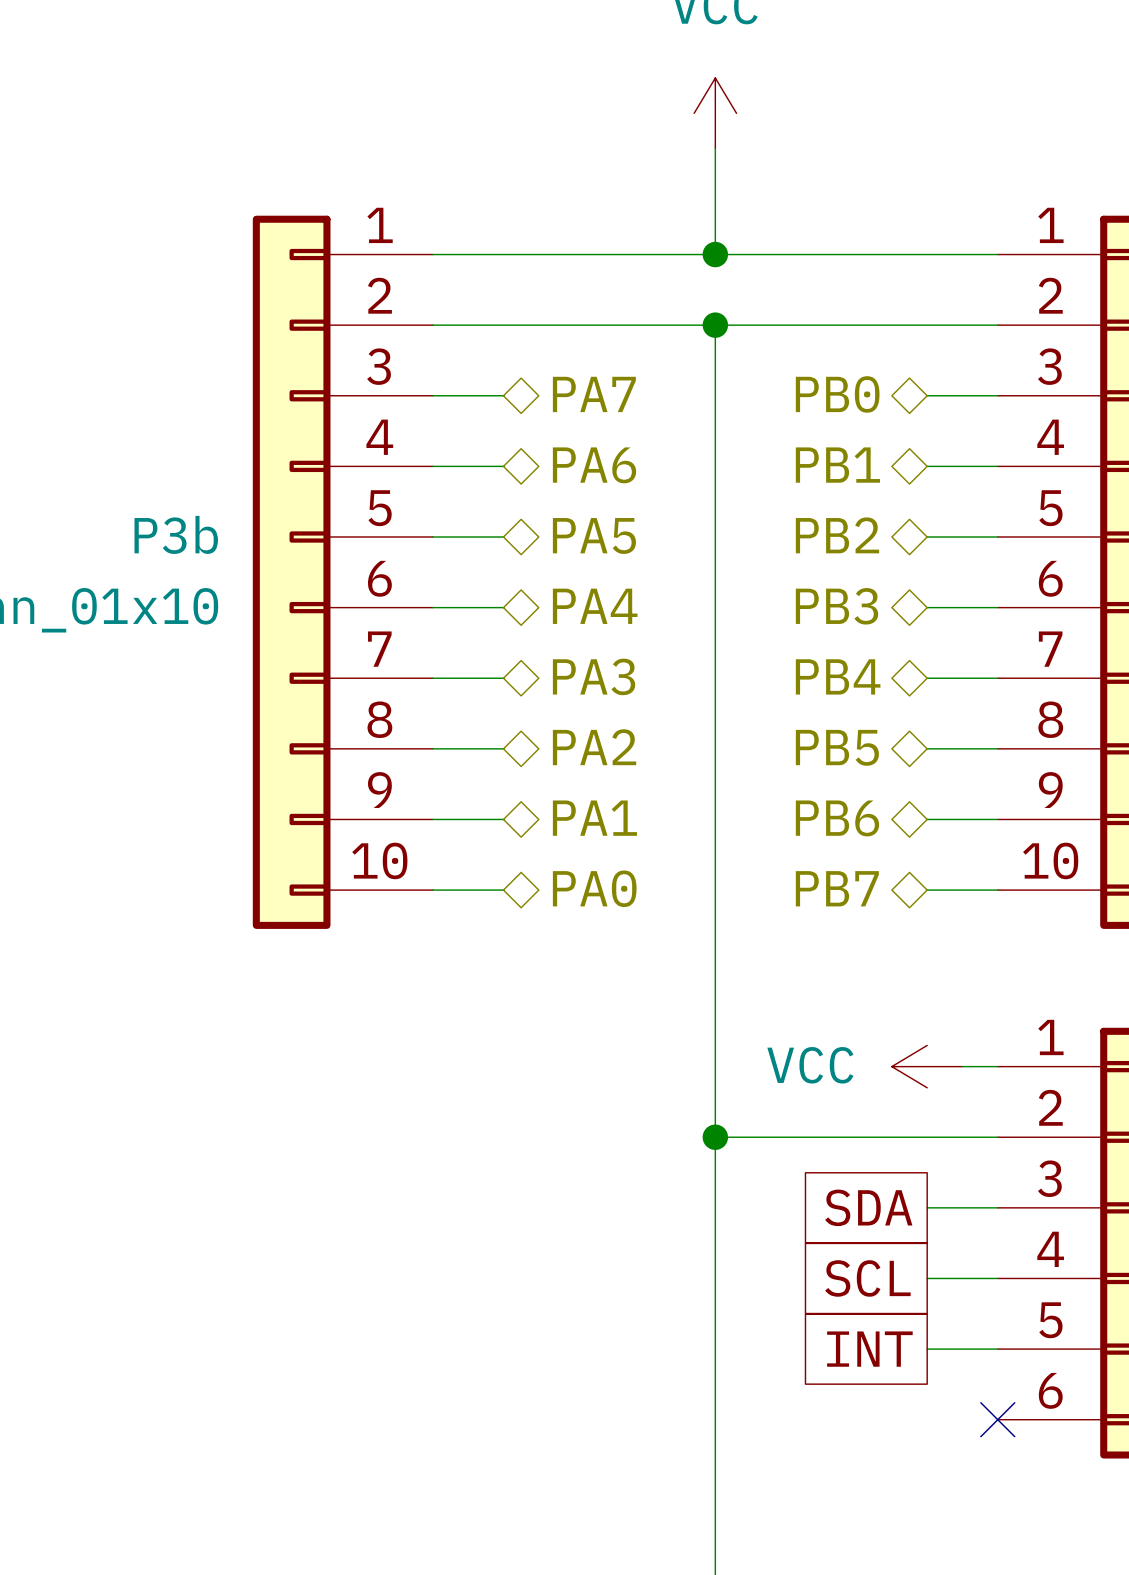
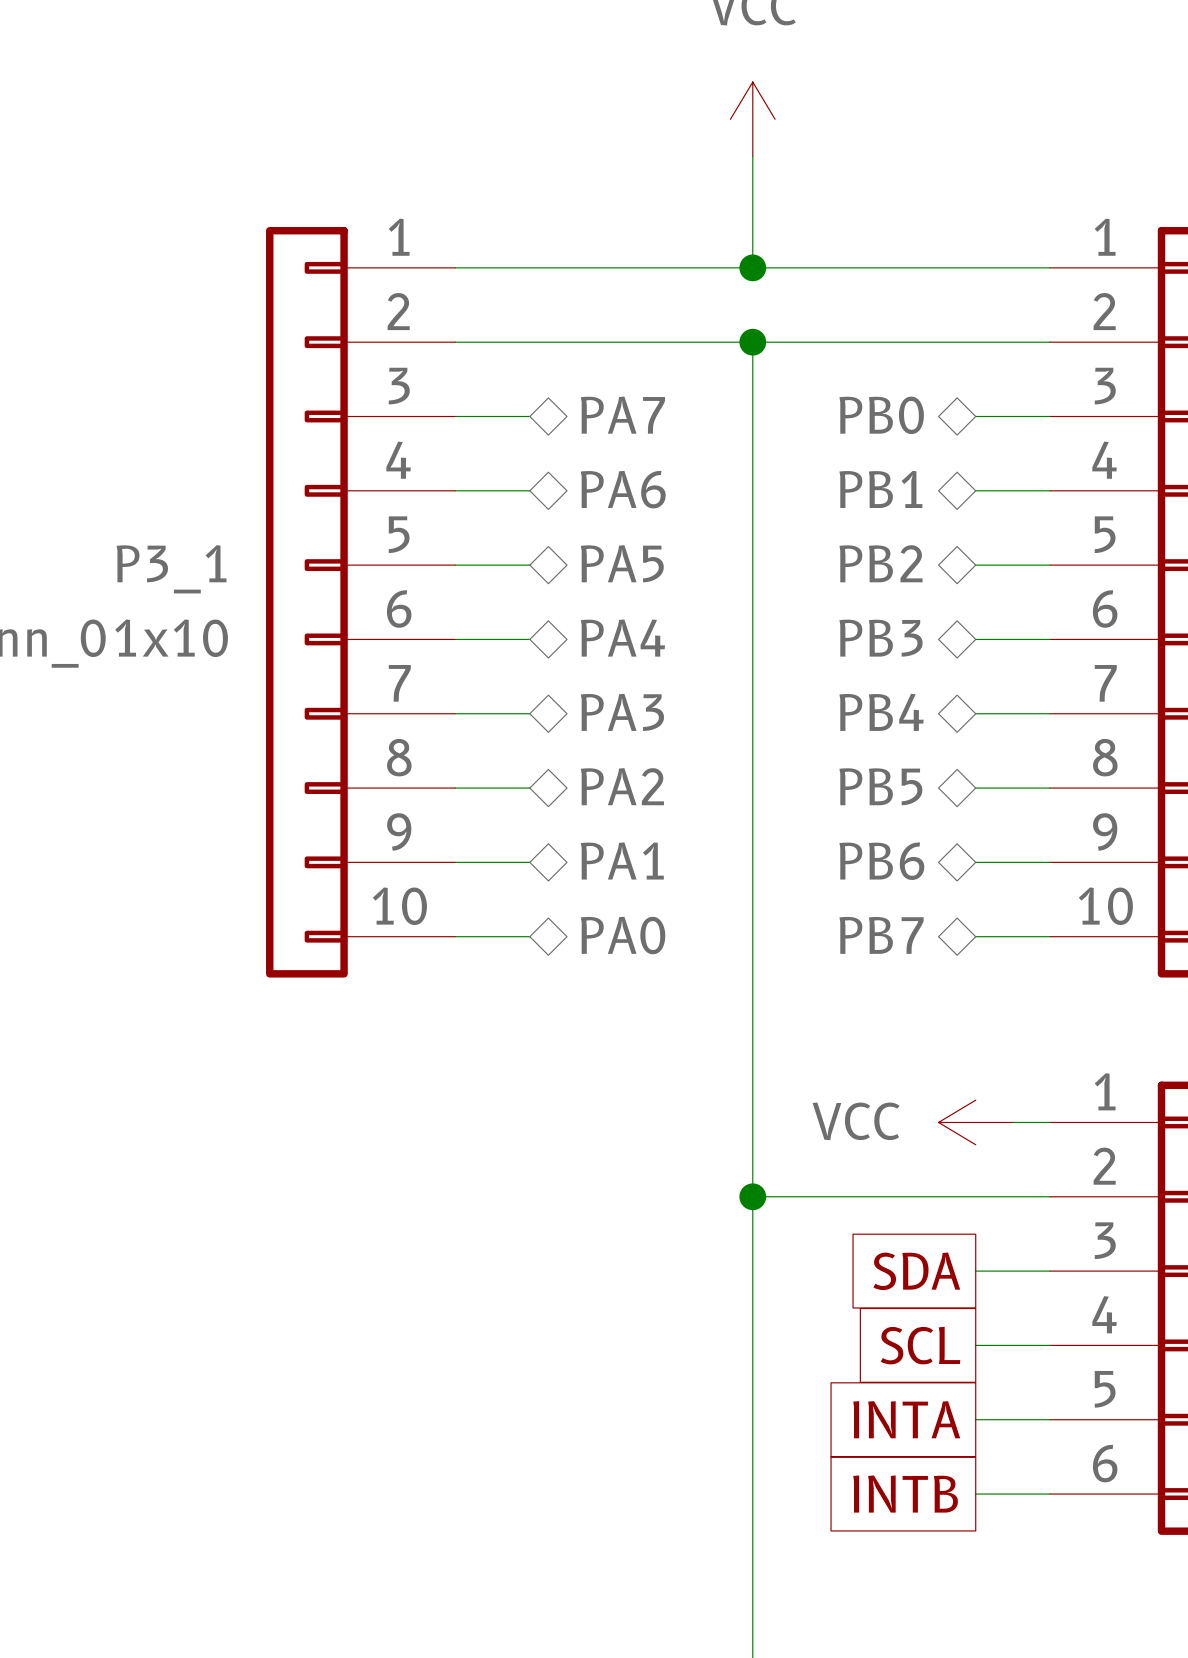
P3b name: P3b (176, 534) -> P3_1 (171, 569)
global label: INT (869, 1349) -> INTA (906, 1419)
global label: none -> INTB (905, 1494)
wire: none -> (975, 1494) (1050, 1494)
no-connect mark: (997, 1419) -> none

